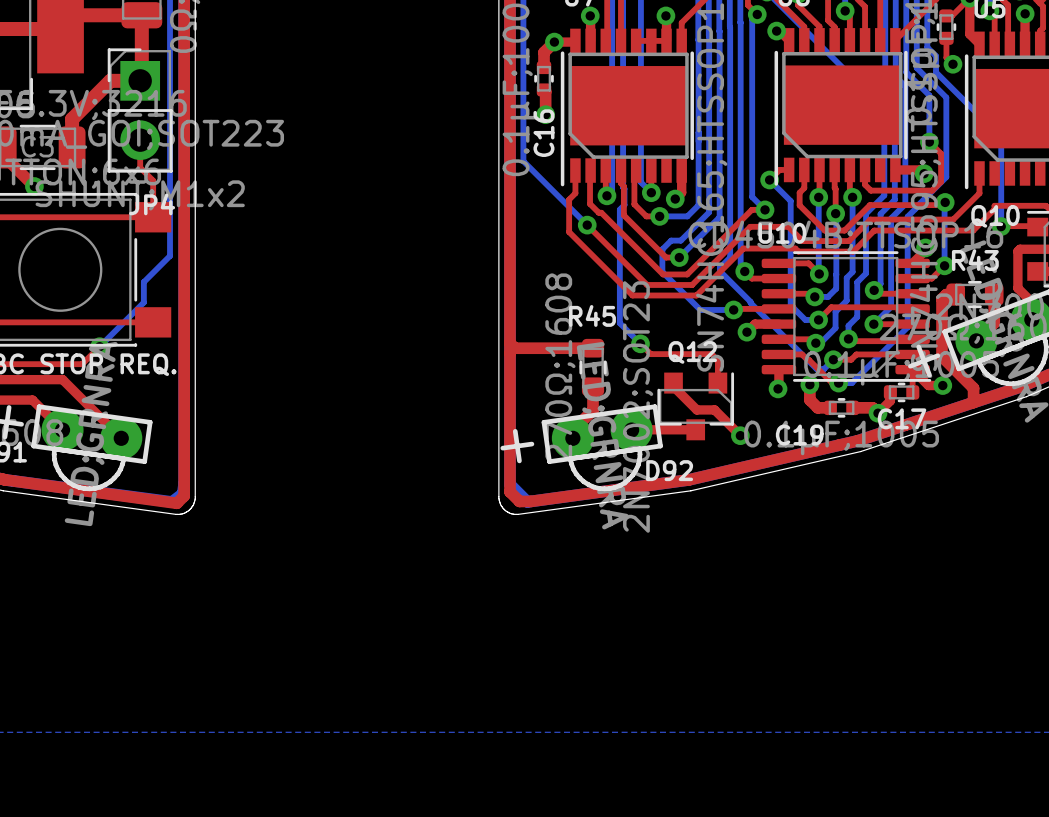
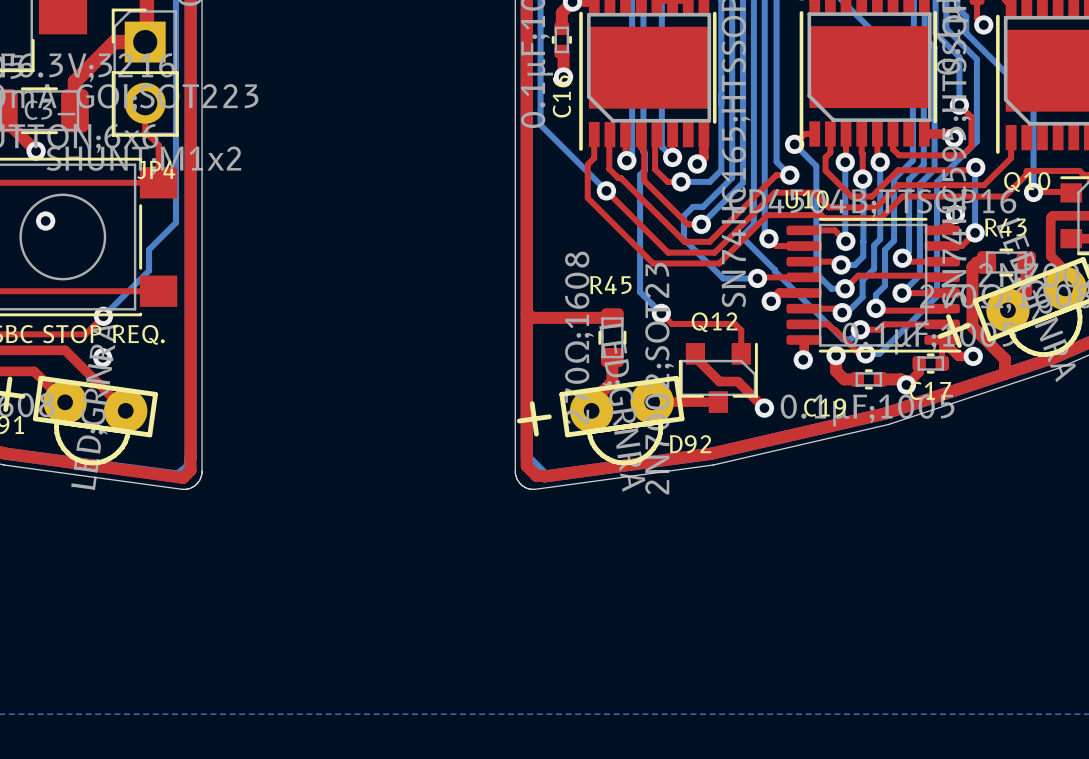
via: none -> (45, 221)
via: none -> (102, 357)

